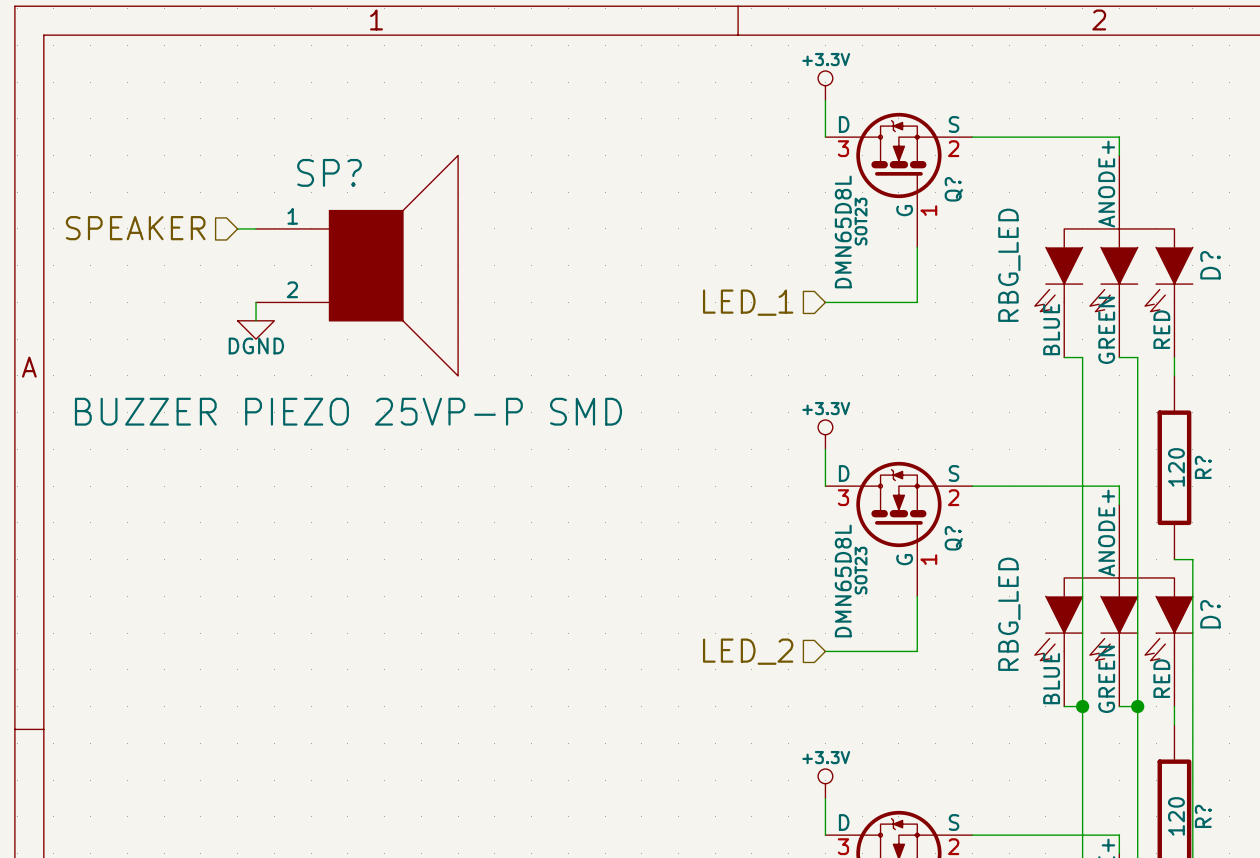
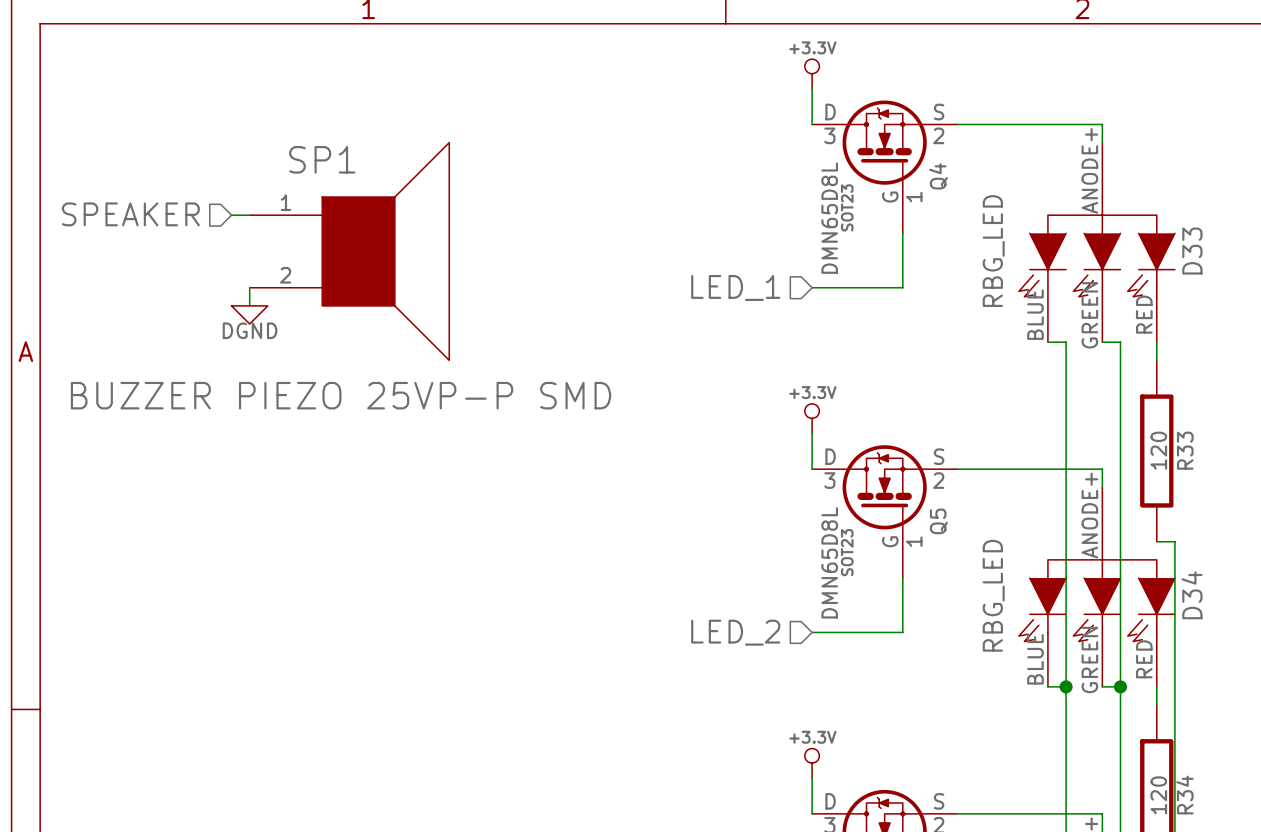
SP? name: SP? (329, 172) -> SP1 (322, 159)
Q? name: Q? (953, 189) -> Q4 (938, 176)
D? name: D? (1210, 265) -> D33 (1192, 251)
R? name: R? (1203, 467) -> R33 (1185, 450)
Q? name: Q? (953, 538) -> Q5 (938, 521)
D? name: D? (1210, 614) -> D34 (1191, 595)
R? name: R? (1203, 816) -> R34 (1184, 795)

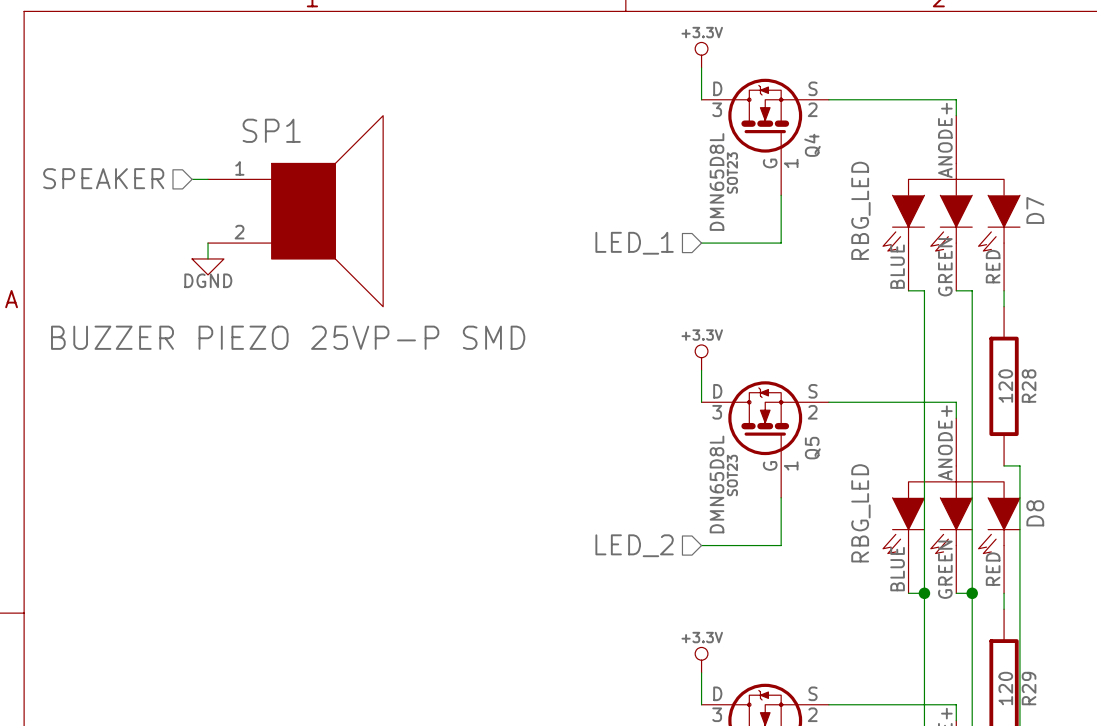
D33 name: D33 (1192, 251) -> D7 (1035, 210)
R33 name: R33 (1185, 450) -> R28 (1029, 386)
D34 name: D34 (1191, 595) -> D8 (1035, 513)
R34 name: R34 (1184, 795) -> R29 (1029, 688)

